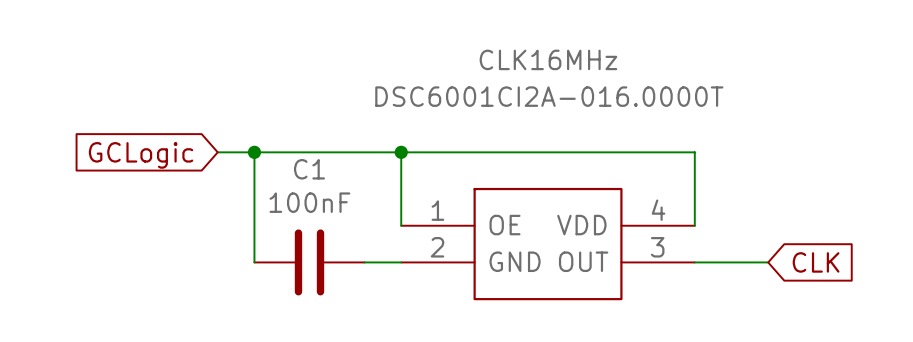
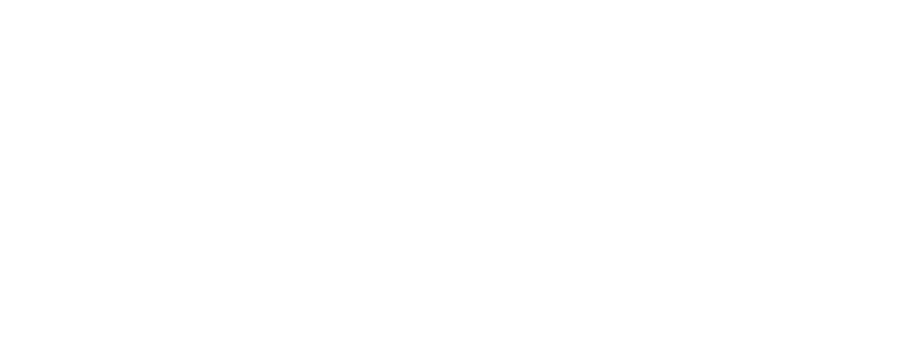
wire: (217, 152) (694, 152) (694, 225) -> none
wire: (254, 152) (254, 262) -> none
junction: (254, 152) -> none
wire: (401, 152) (401, 225) -> none
junction: (401, 152) -> none
global label: GCLogic (141, 155) -> none
CLK16MHz: DSC6001CI2A-016.0000T (548, 244) -> none
C1: 100nF (309, 262) -> none
wire: (364, 262) (401, 262) -> none
wire: (694, 262) (768, 262) -> none
global label: CLK (816, 262) -> none

